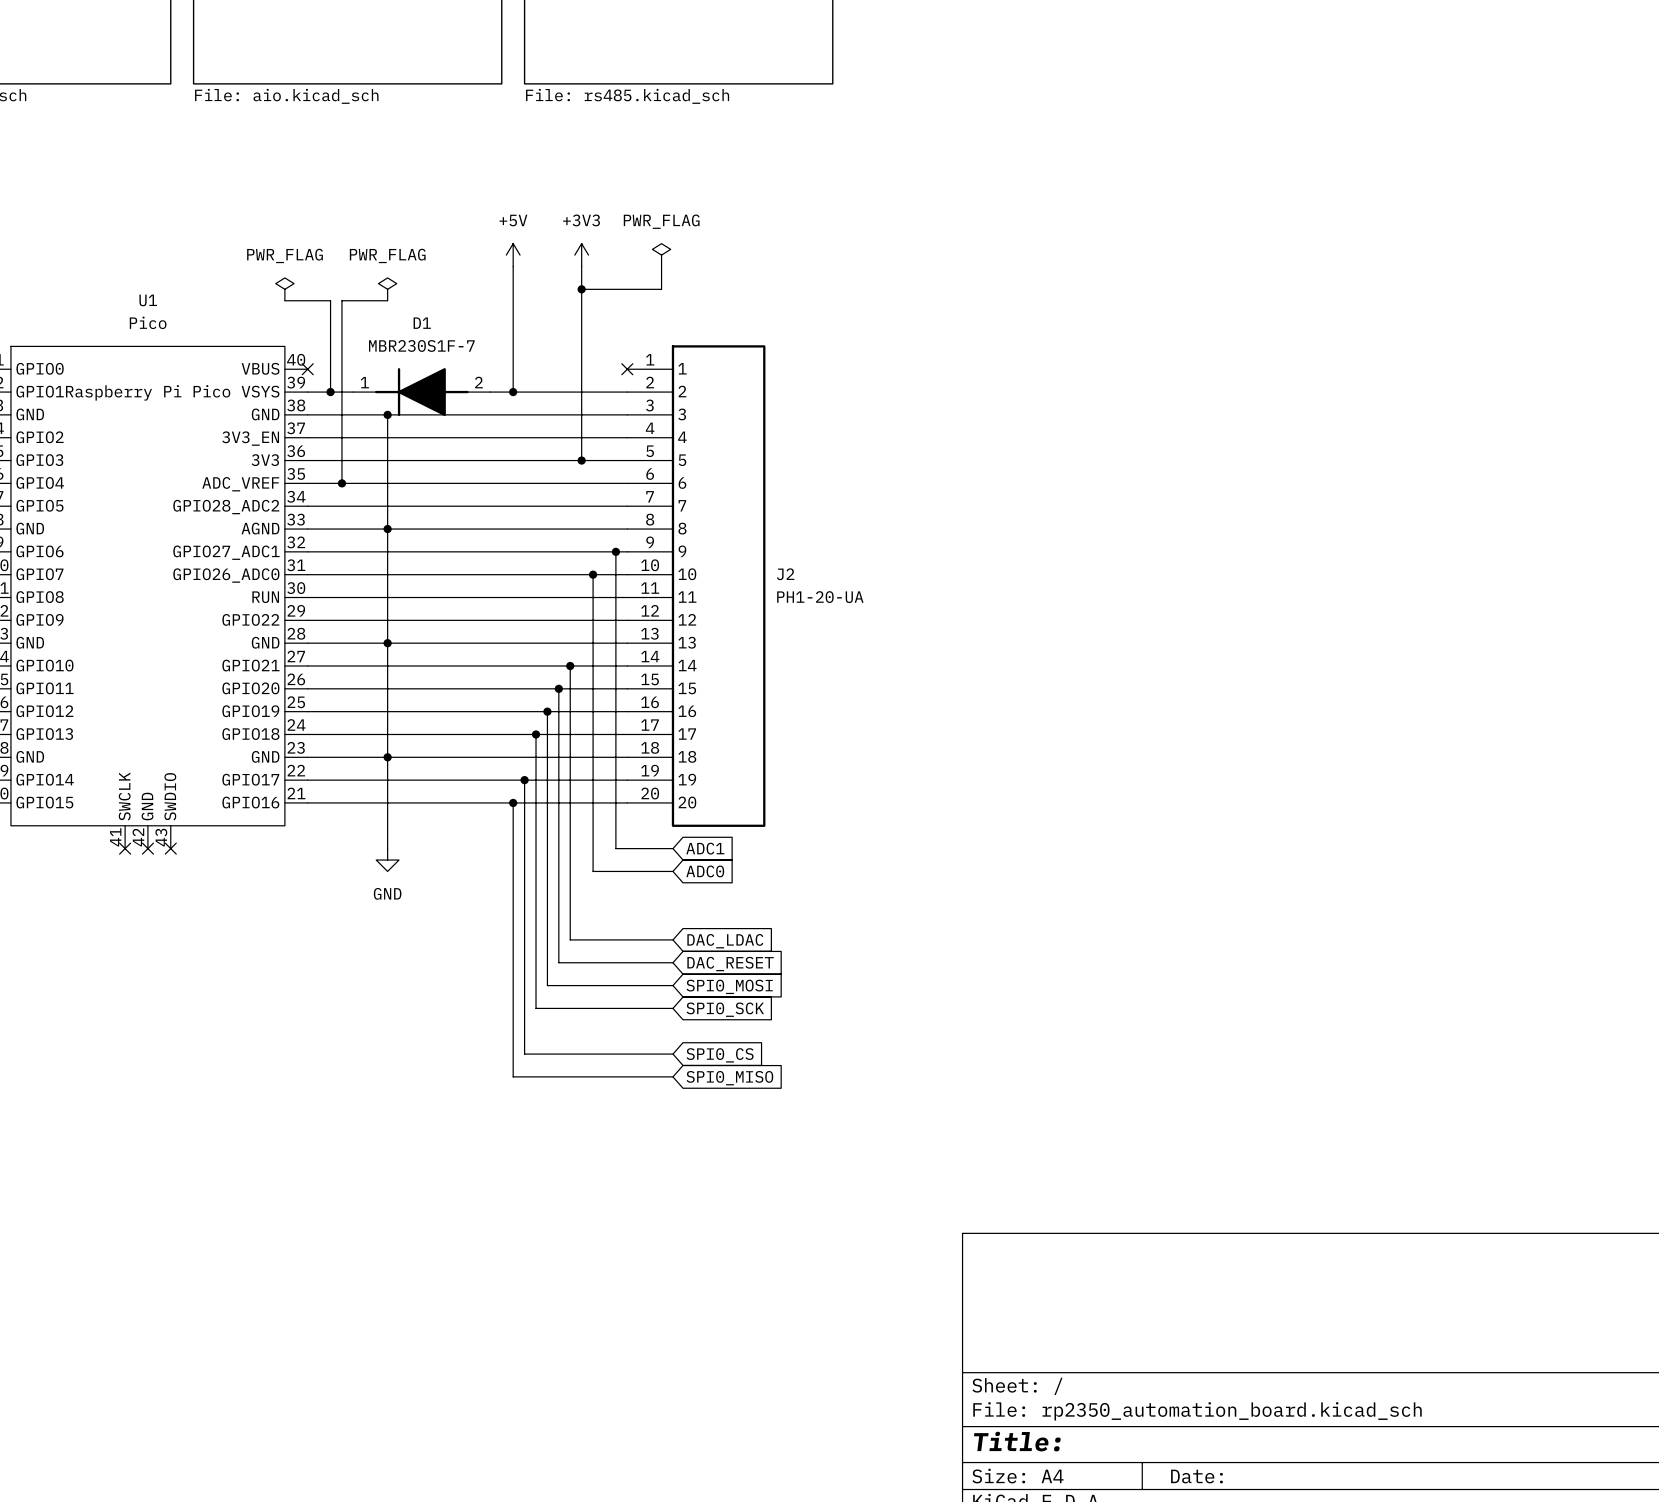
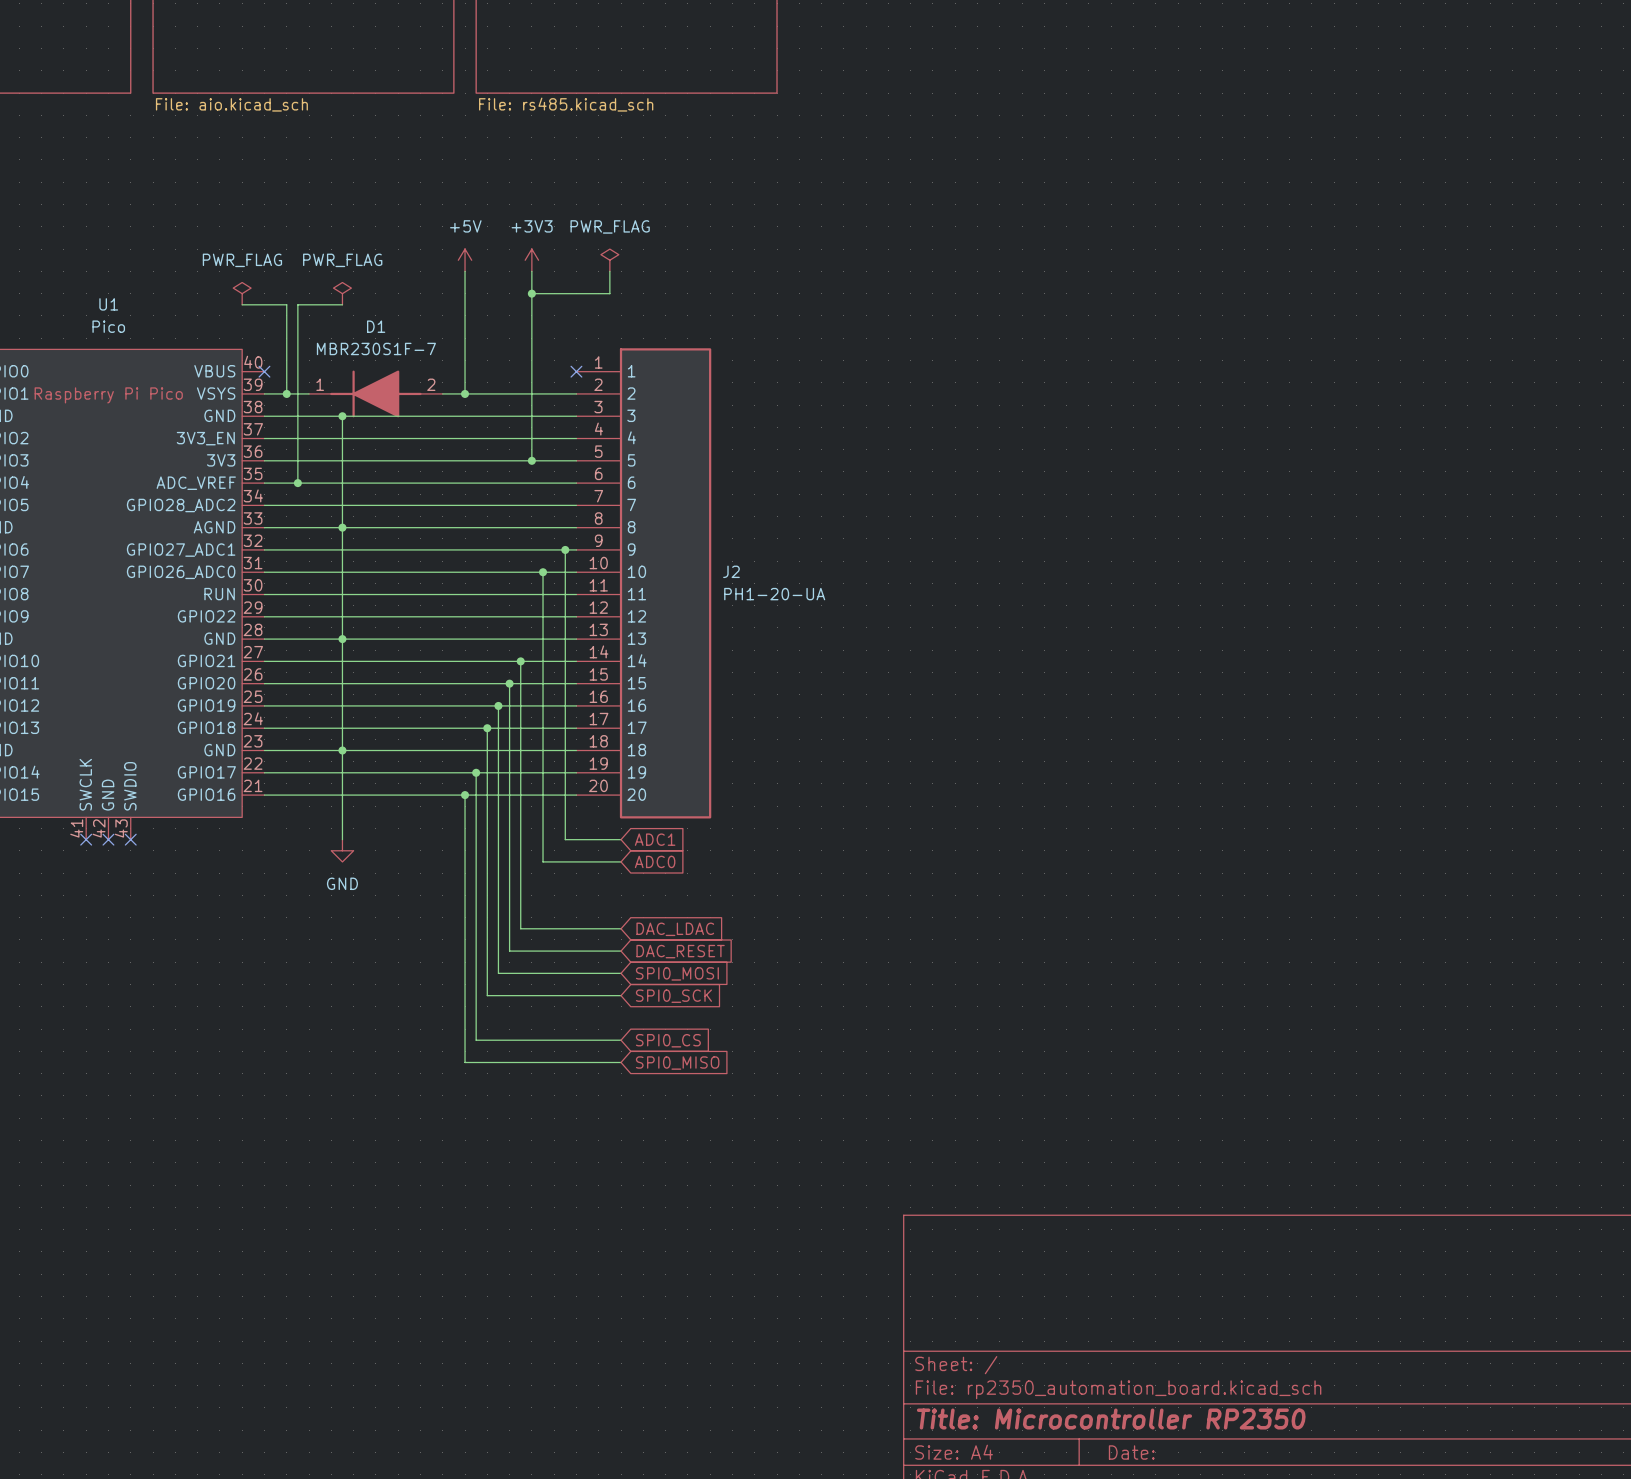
title block: Title: (1017, 1441) -> Title: Microcontroller RP2350 (1111, 1419)

